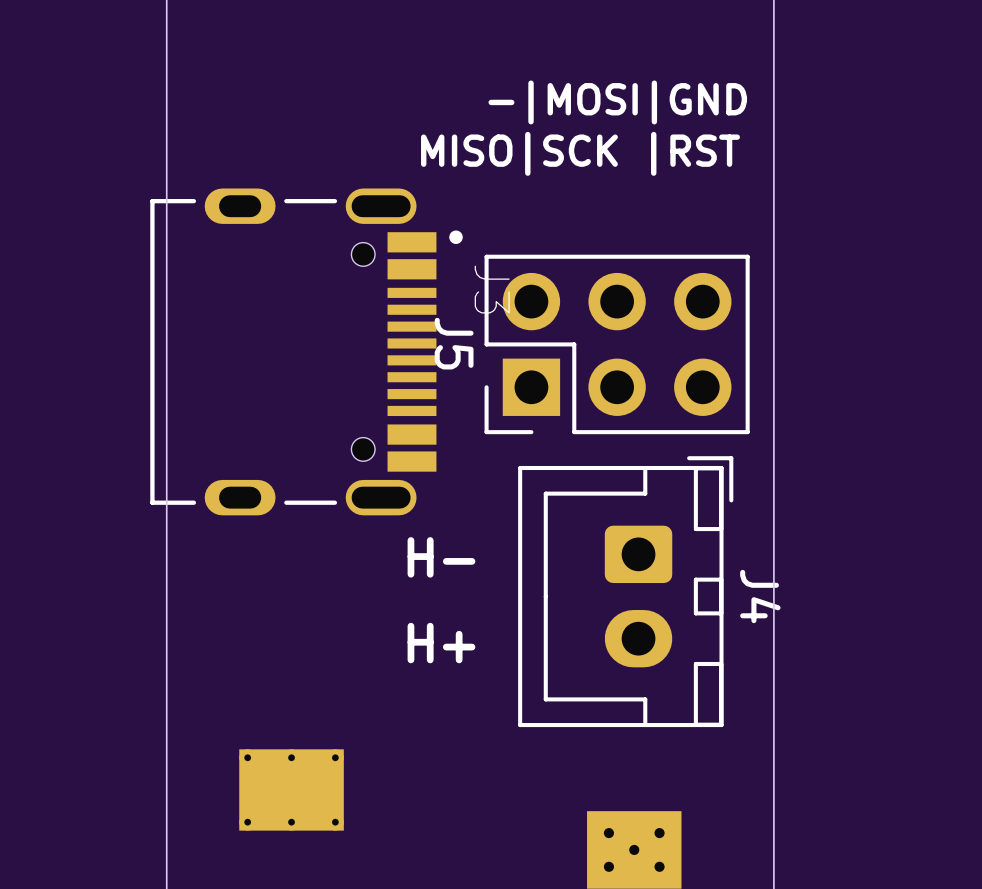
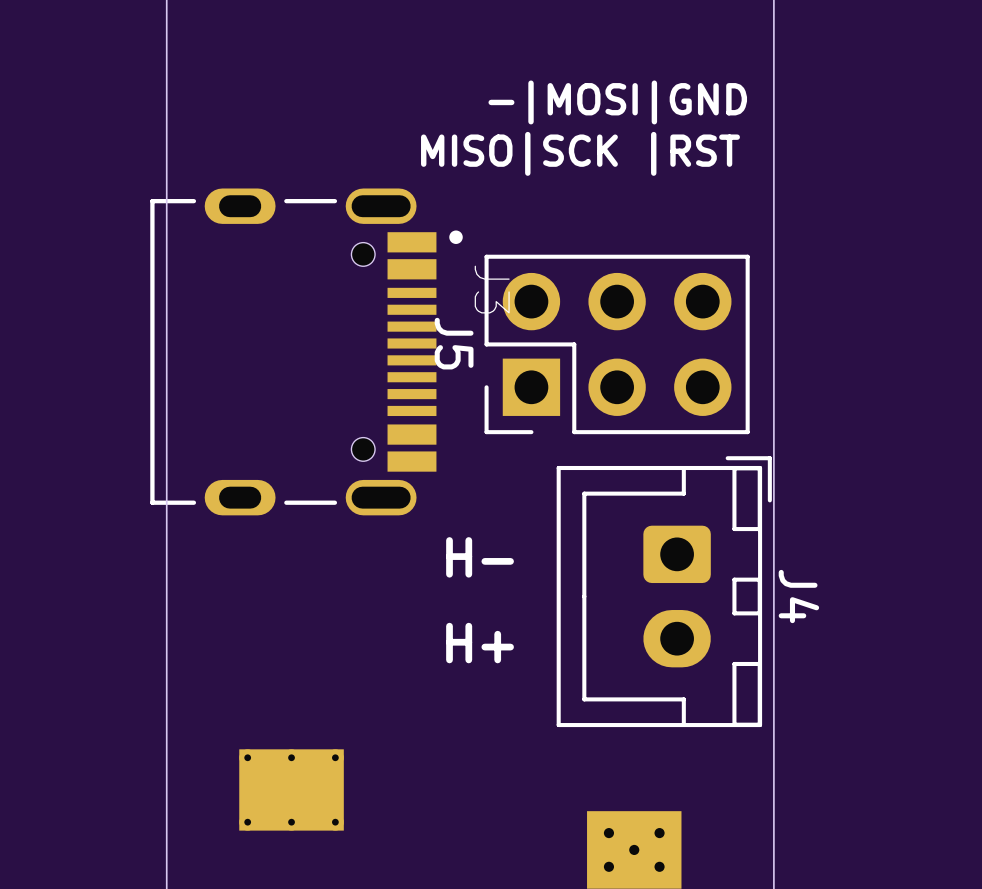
text position: H- (441, 557) -> H- (480, 557)
J4 position: (625, 591) -> (664, 591)
text position: H+ (441, 643) -> H+ (480, 643)

